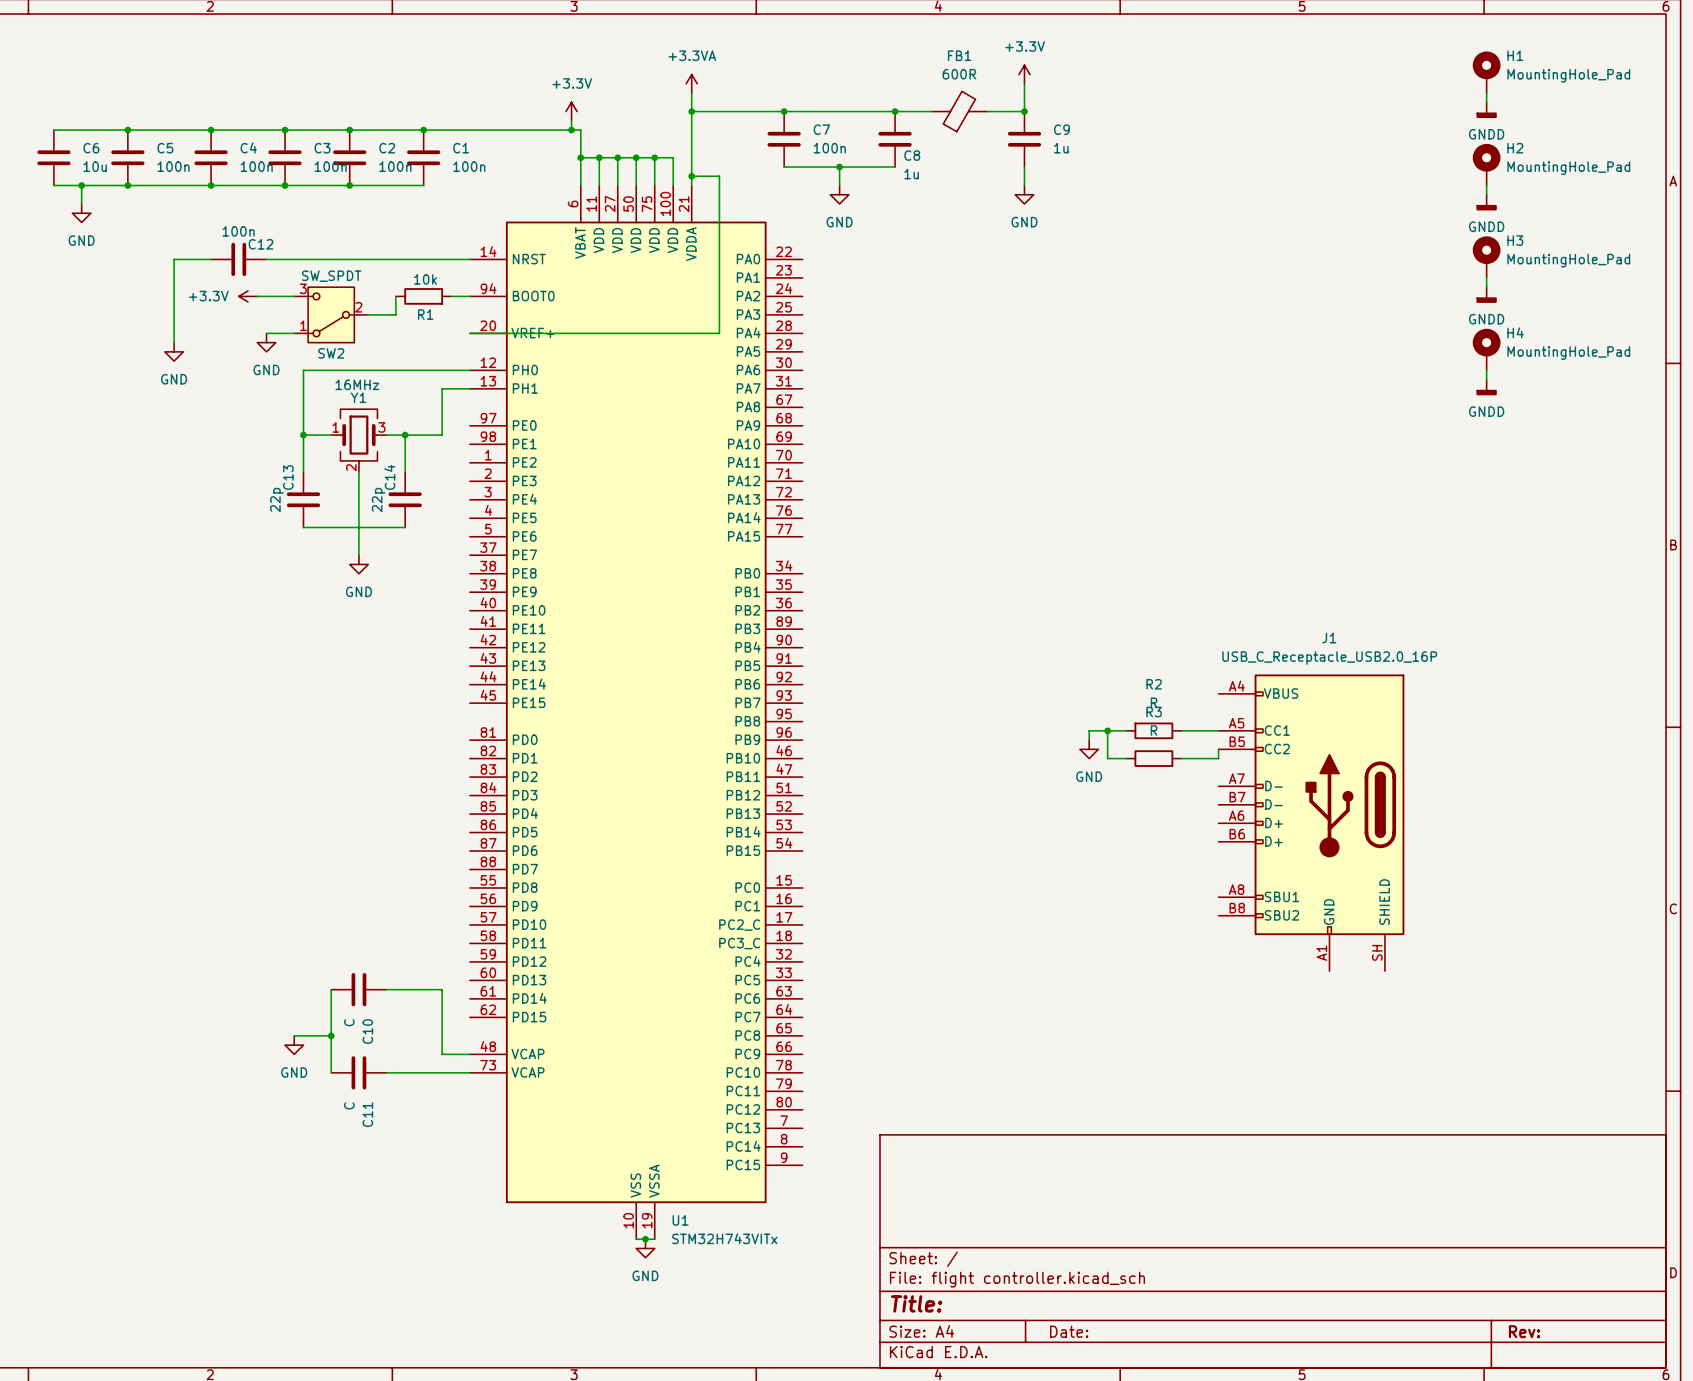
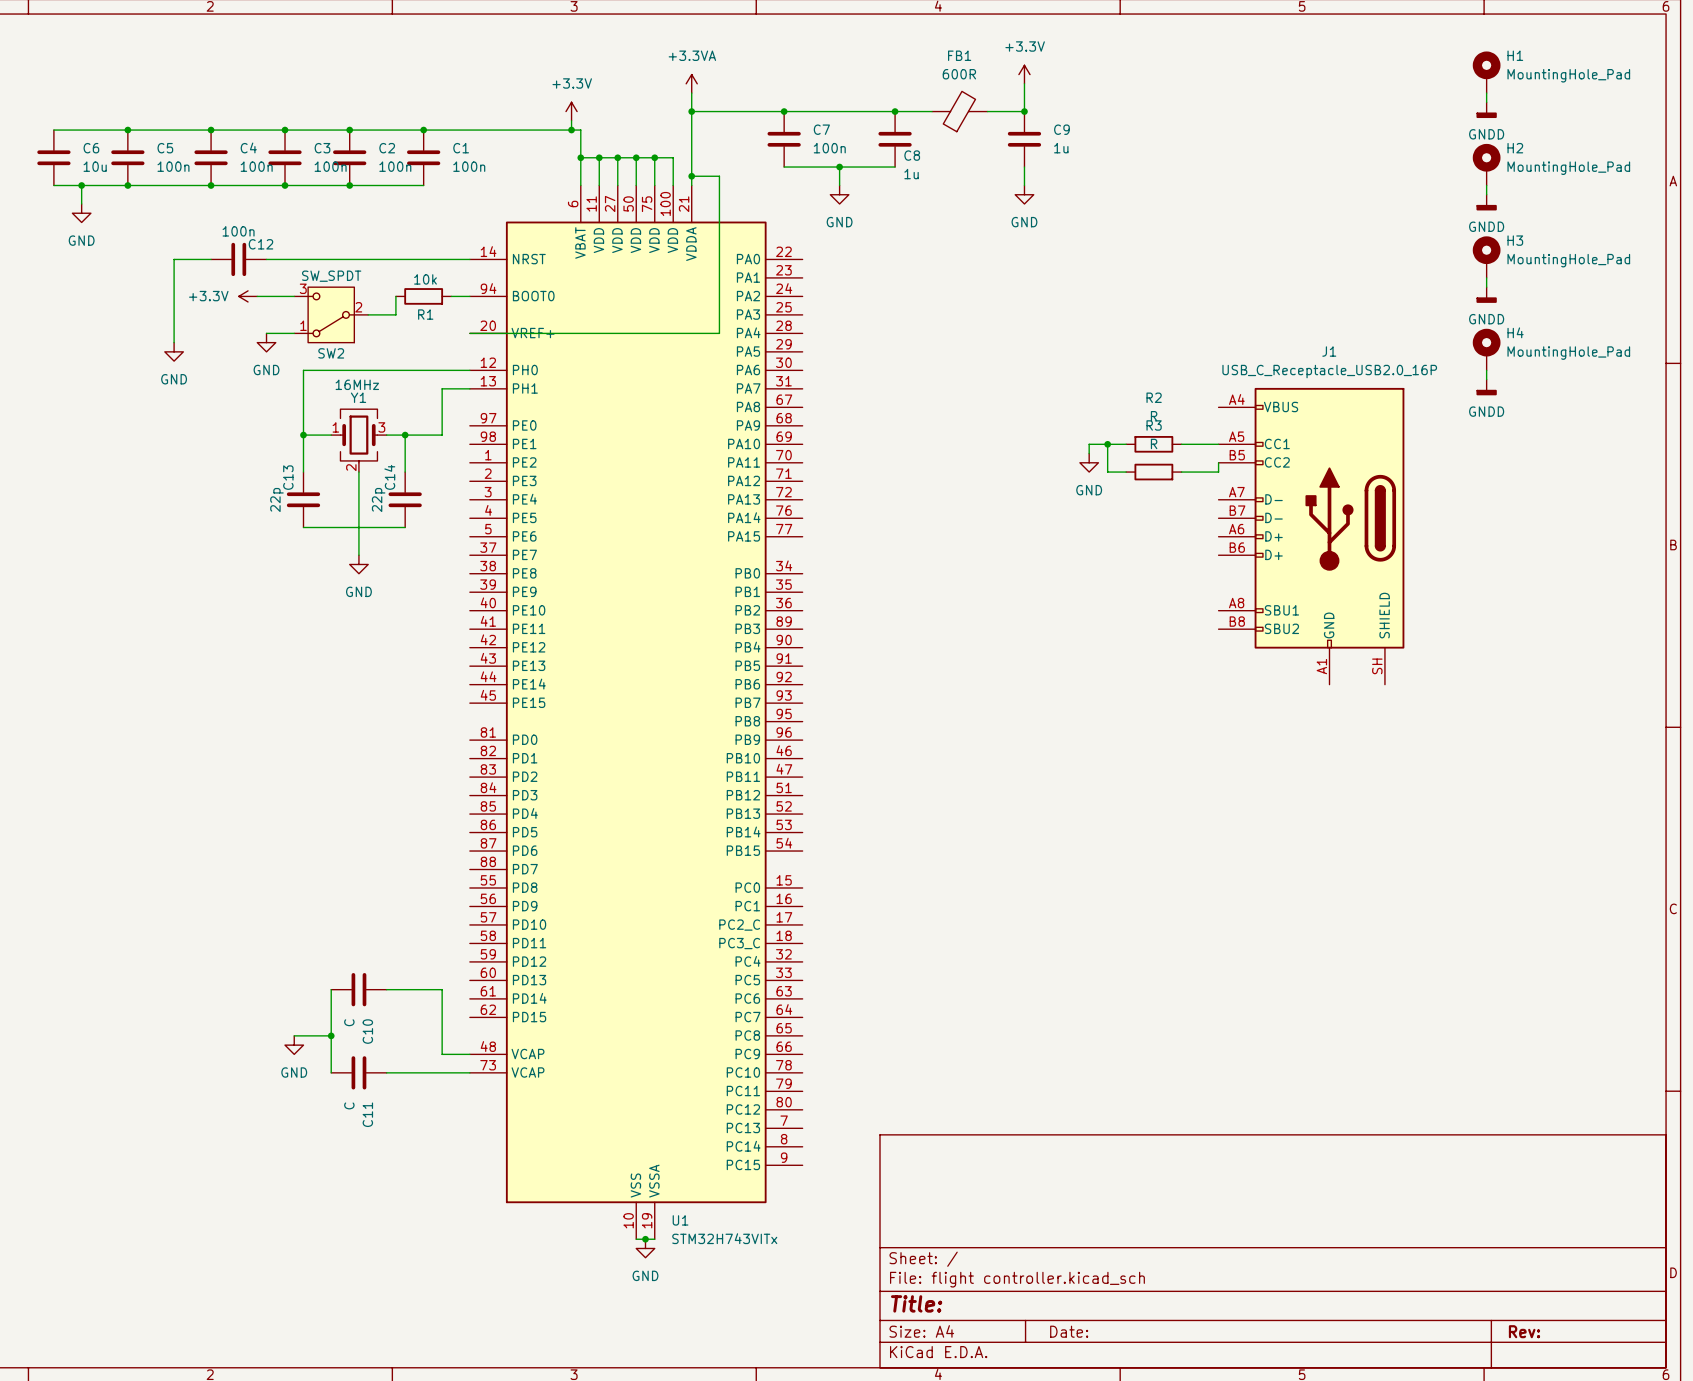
wire: none -> (1107, 444) (1107, 472) (1126, 472)
junction: none -> (1107, 444)
wire: none -> (1126, 444) (1089, 444) (1089, 453)
wire: none -> (1181, 444) (1218, 444)
power symbol: none -> GND (1089, 462)
wire: none -> (1218, 462) (1218, 472) (1181, 472)
wire: (1107, 730) (1107, 758) (1126, 758) -> none
junction: (1107, 730) -> none
wire: (1126, 730) (1089, 730) (1089, 740) -> none
R2 position: (1153, 730) -> (1153, 444)
wire: (1181, 730) (1218, 730) -> none
power symbol: GND (1089, 749) -> none
wire: (1218, 749) (1218, 758) (1181, 758) -> none
R3 position: (1153, 758) -> (1153, 472)
J1 position: (1311, 822) -> (1311, 536)

